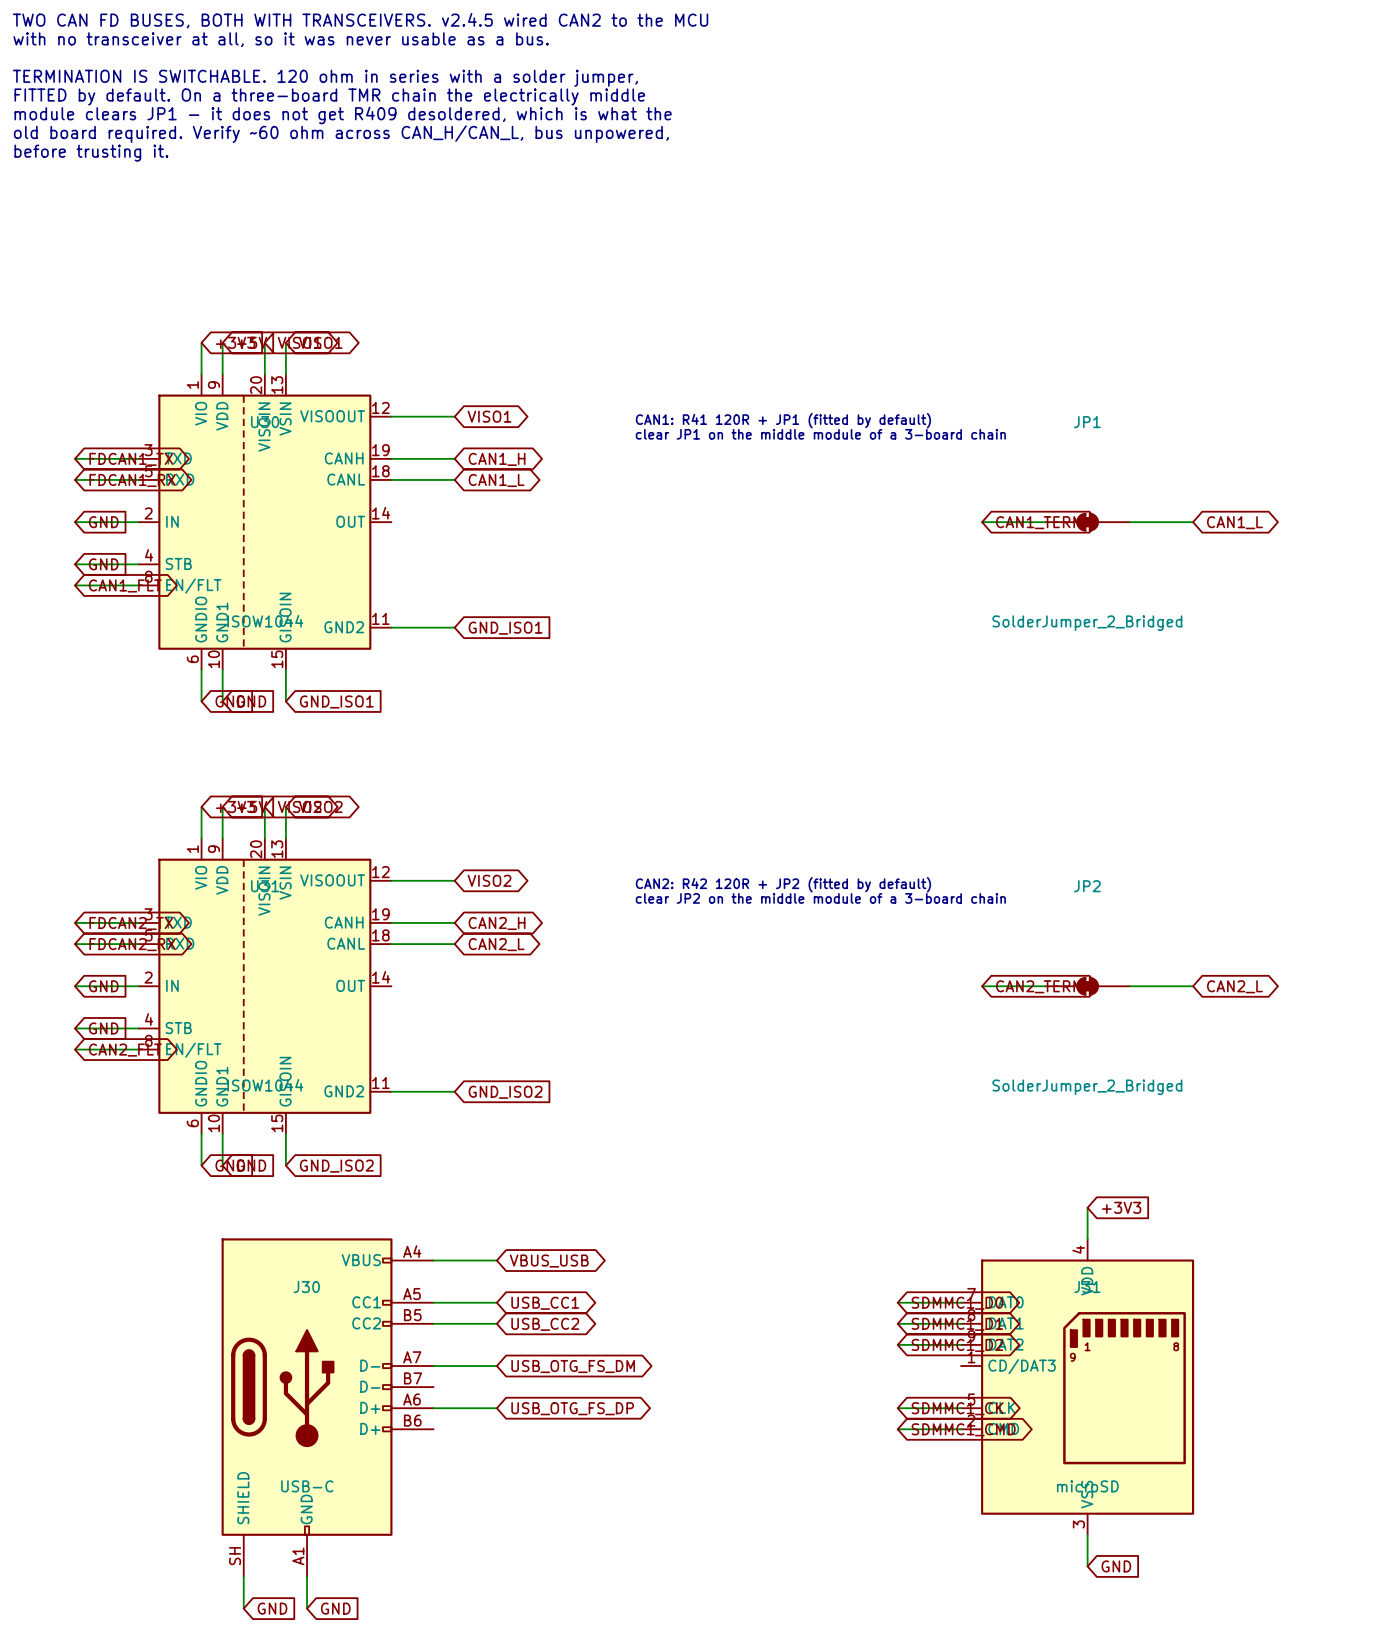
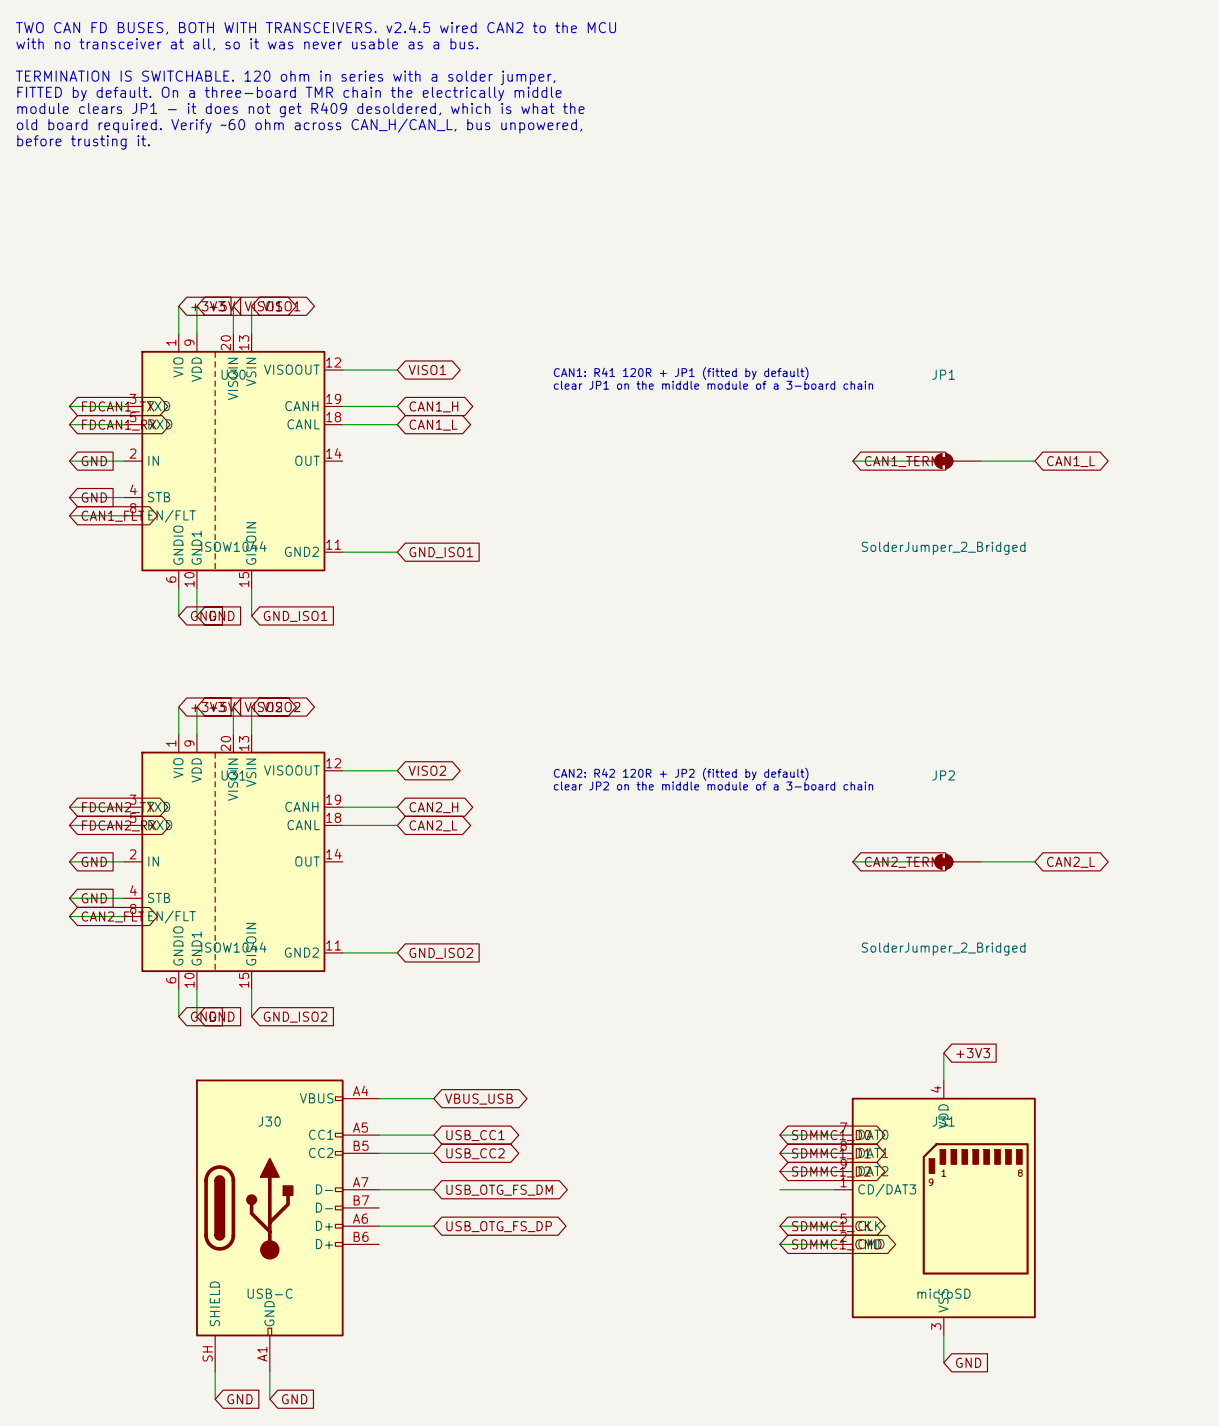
wire: none -> (779, 1189) (834, 1189)

